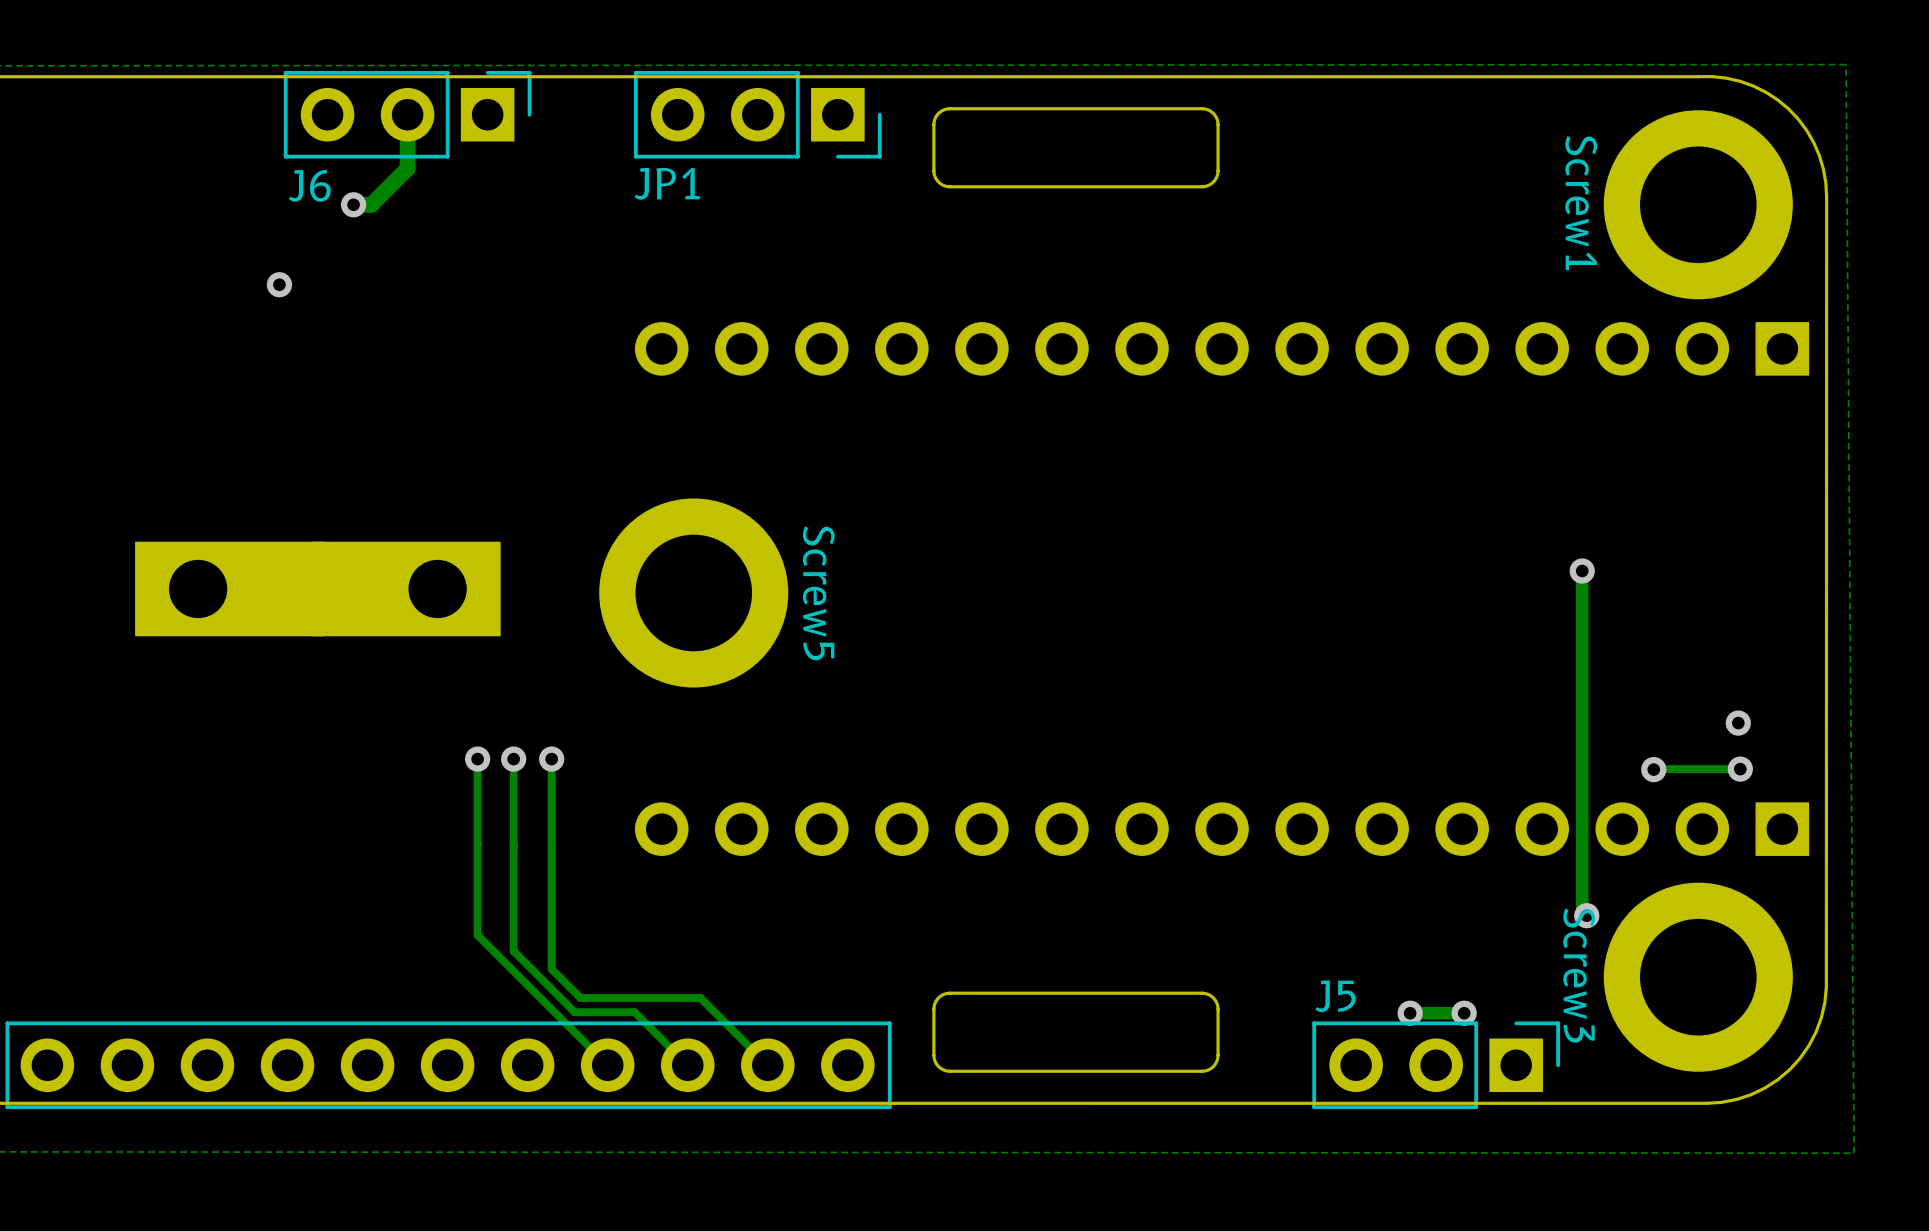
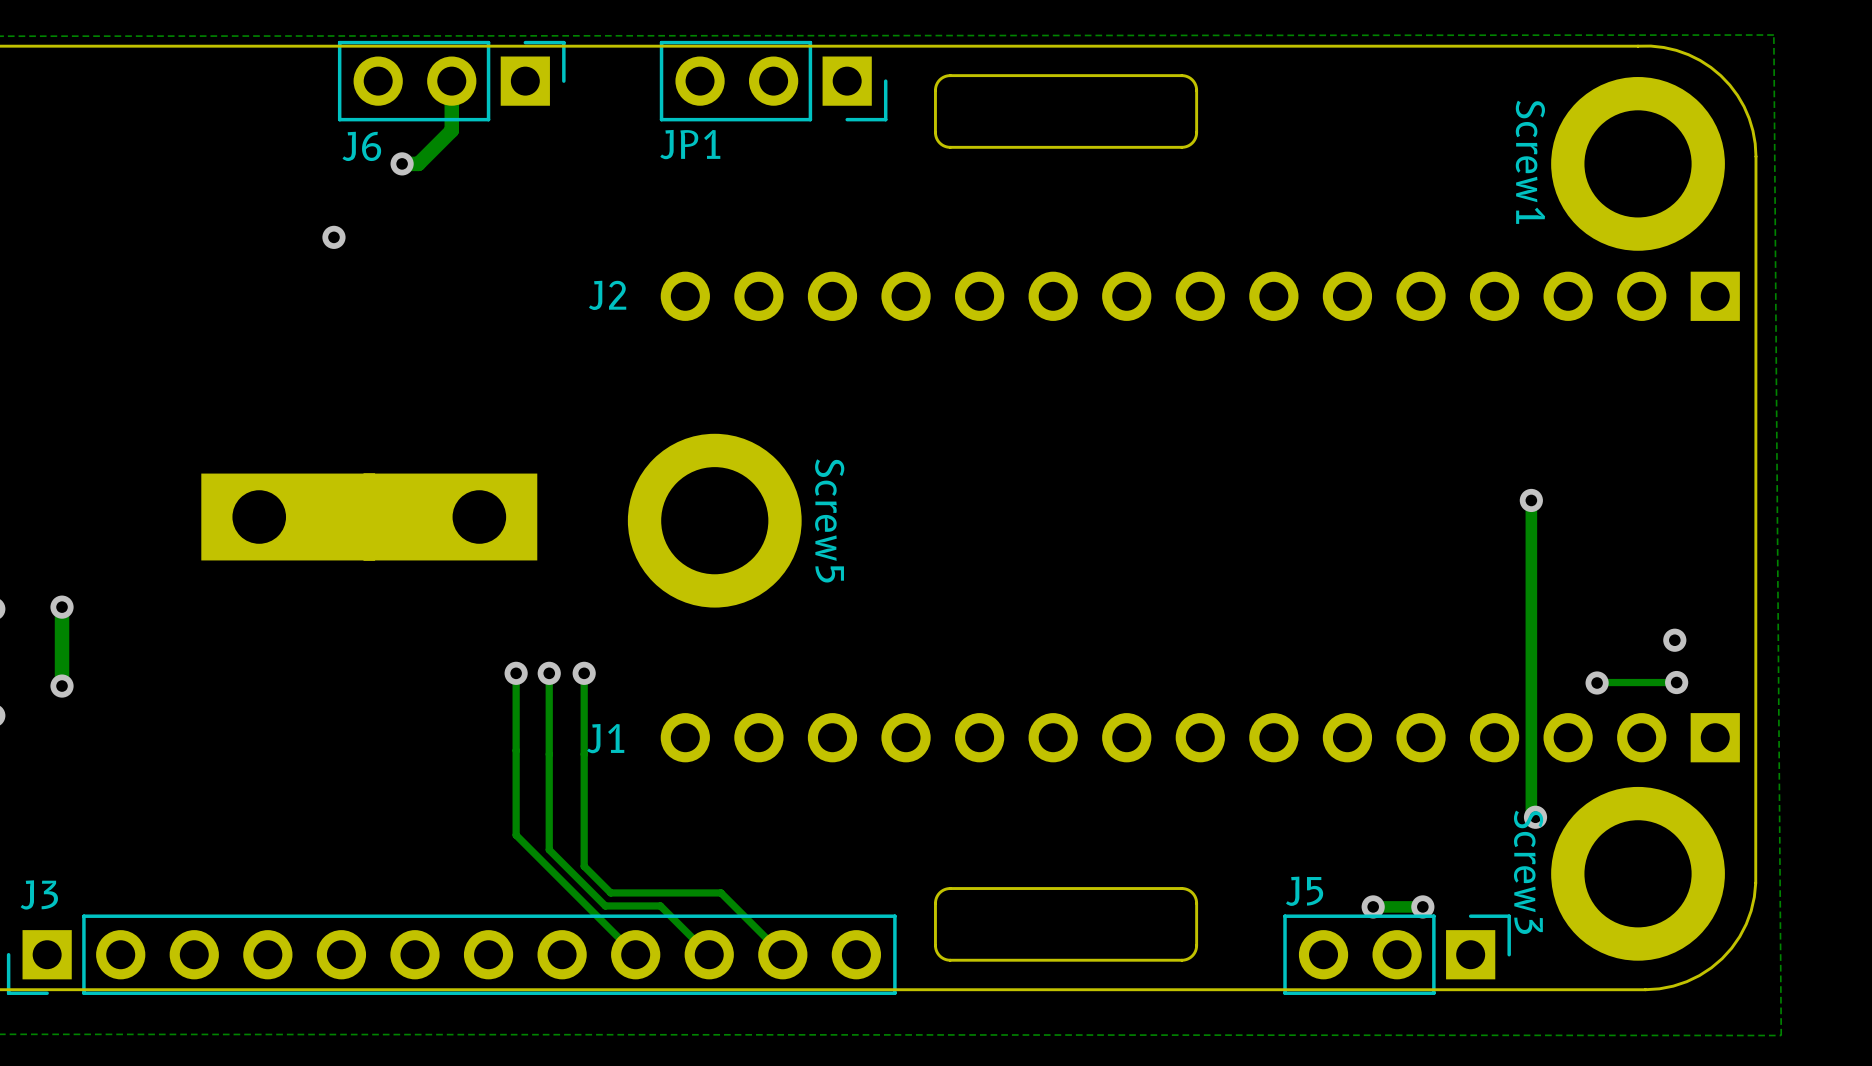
J2 name: none -> J2 (607, 295)
J1 name: none -> J1 (605, 738)

